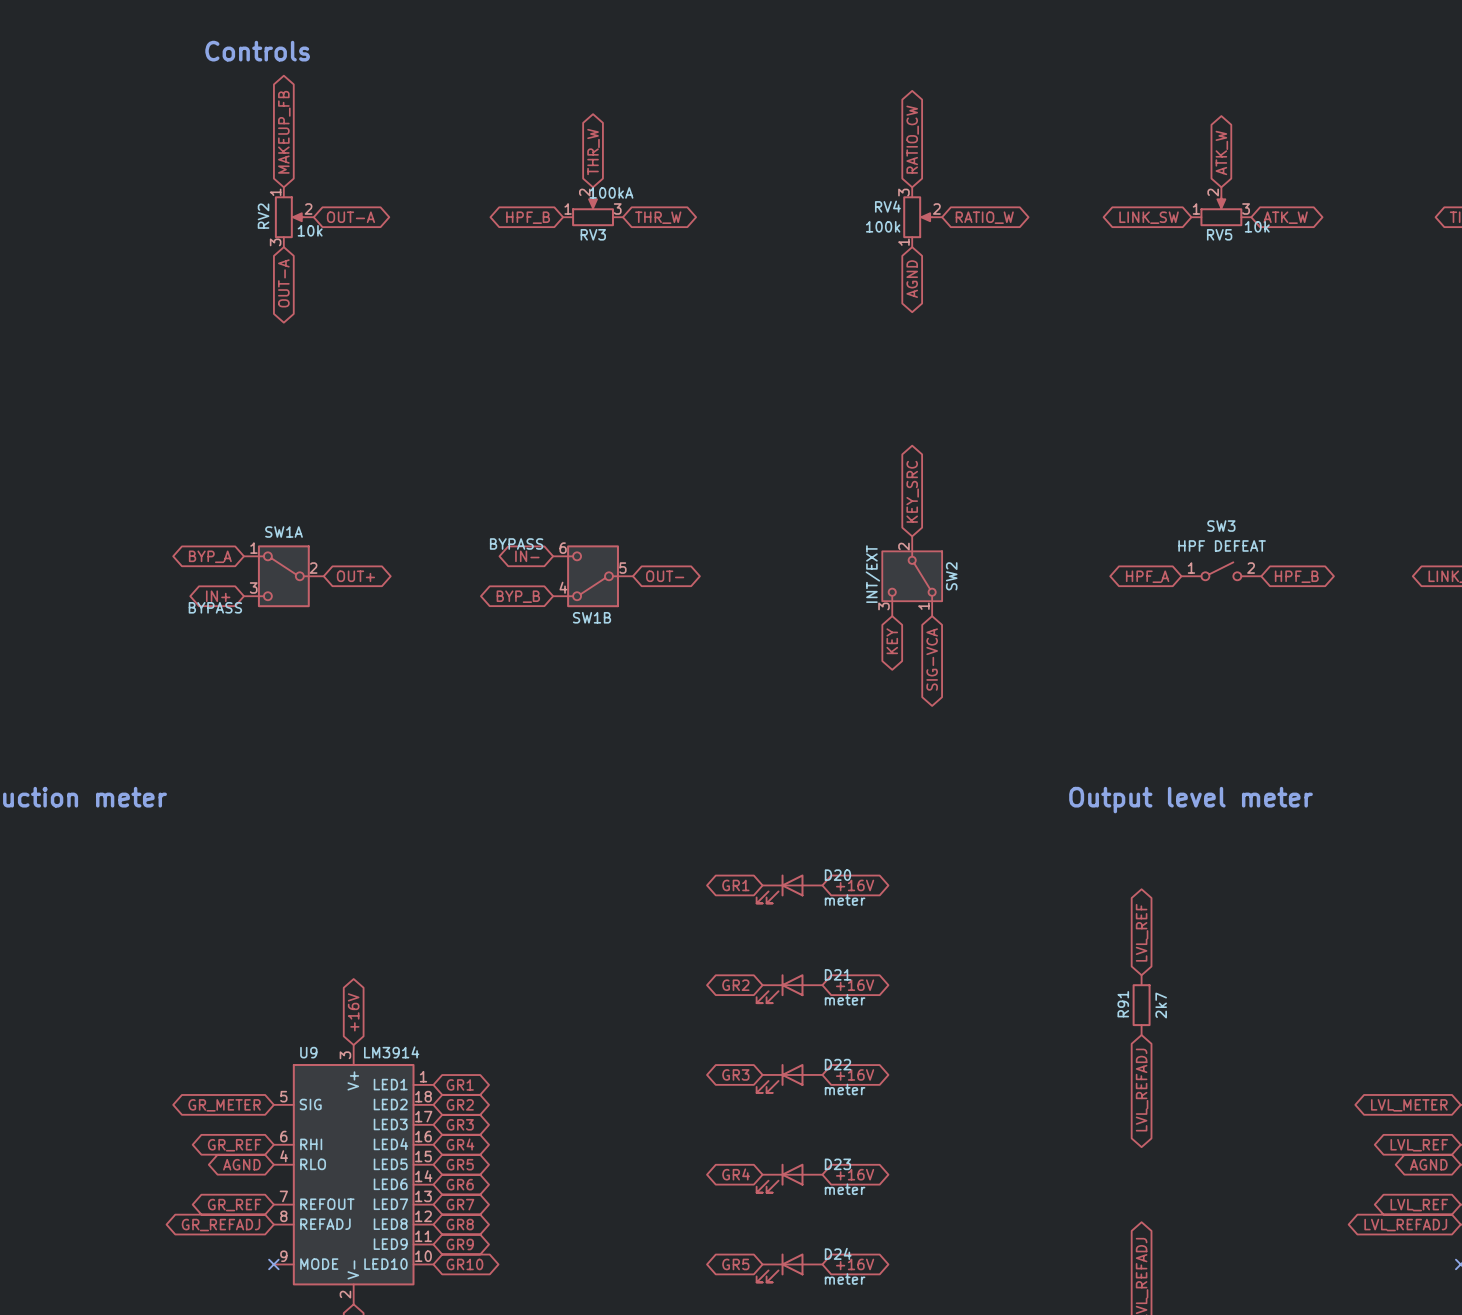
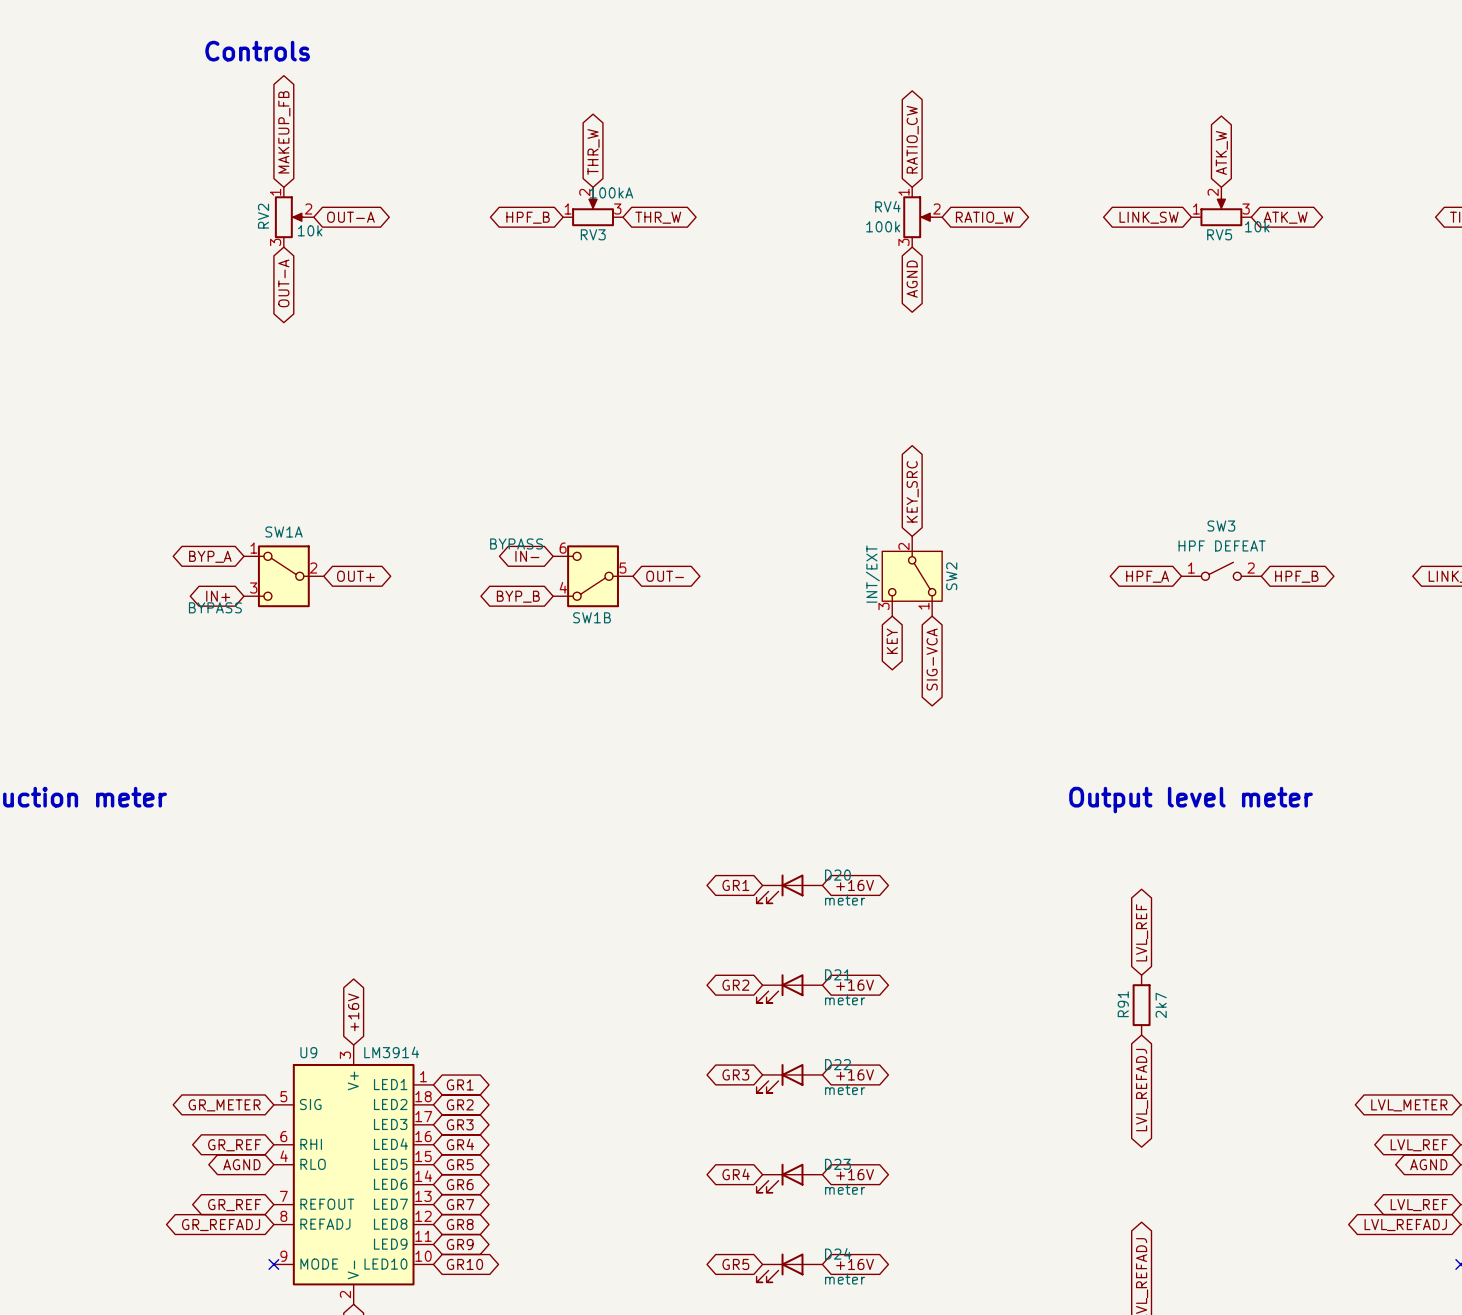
RV4 flip: as is (917, 217) -> up-down (917, 217)

